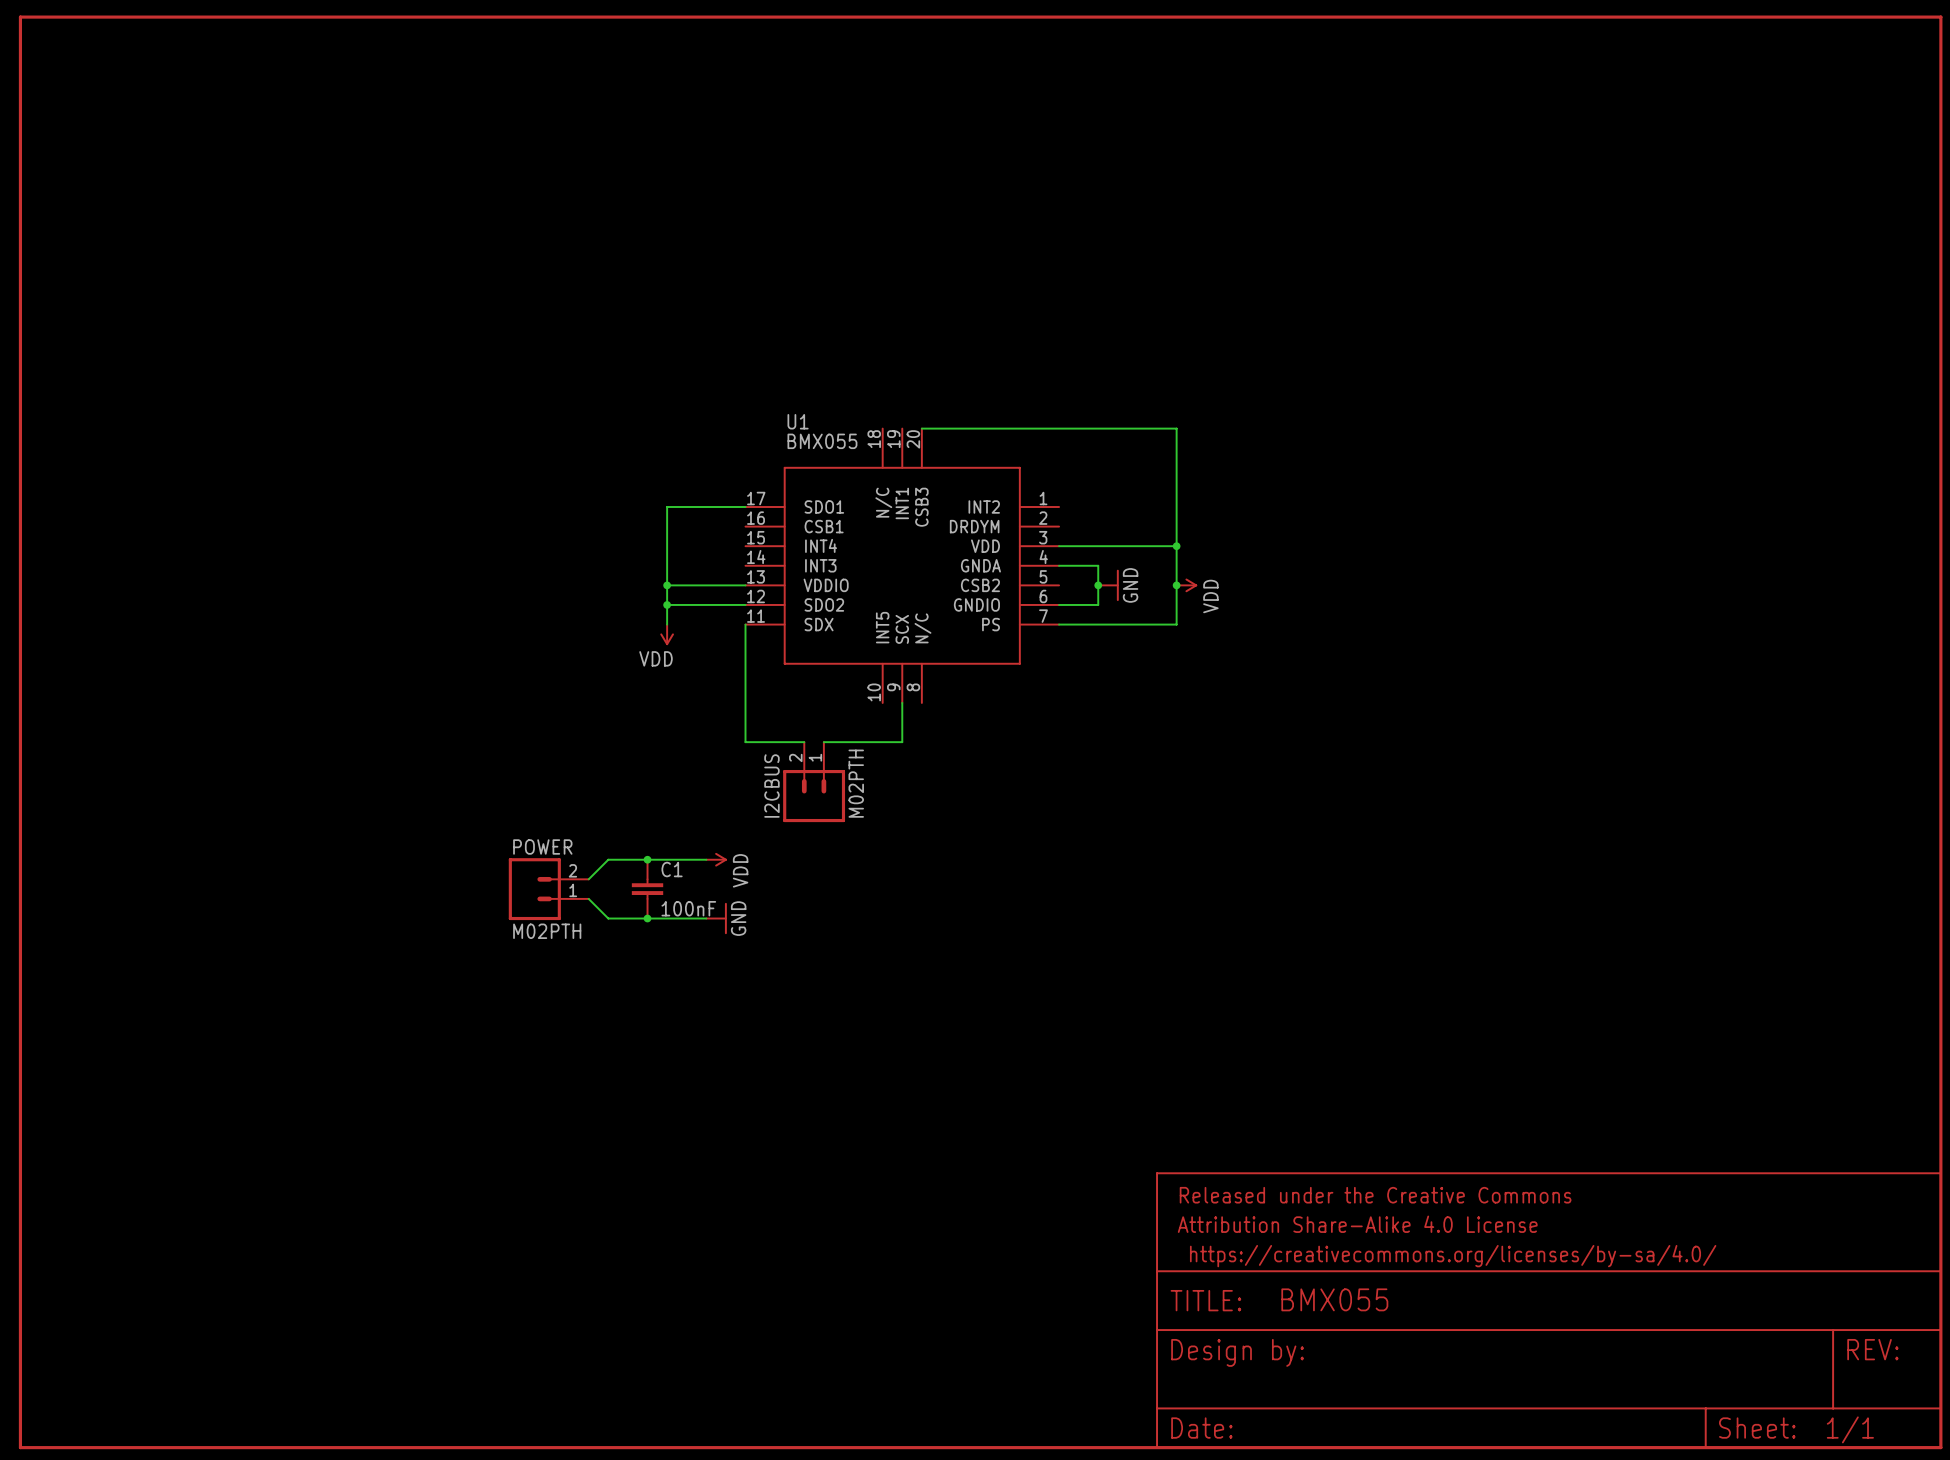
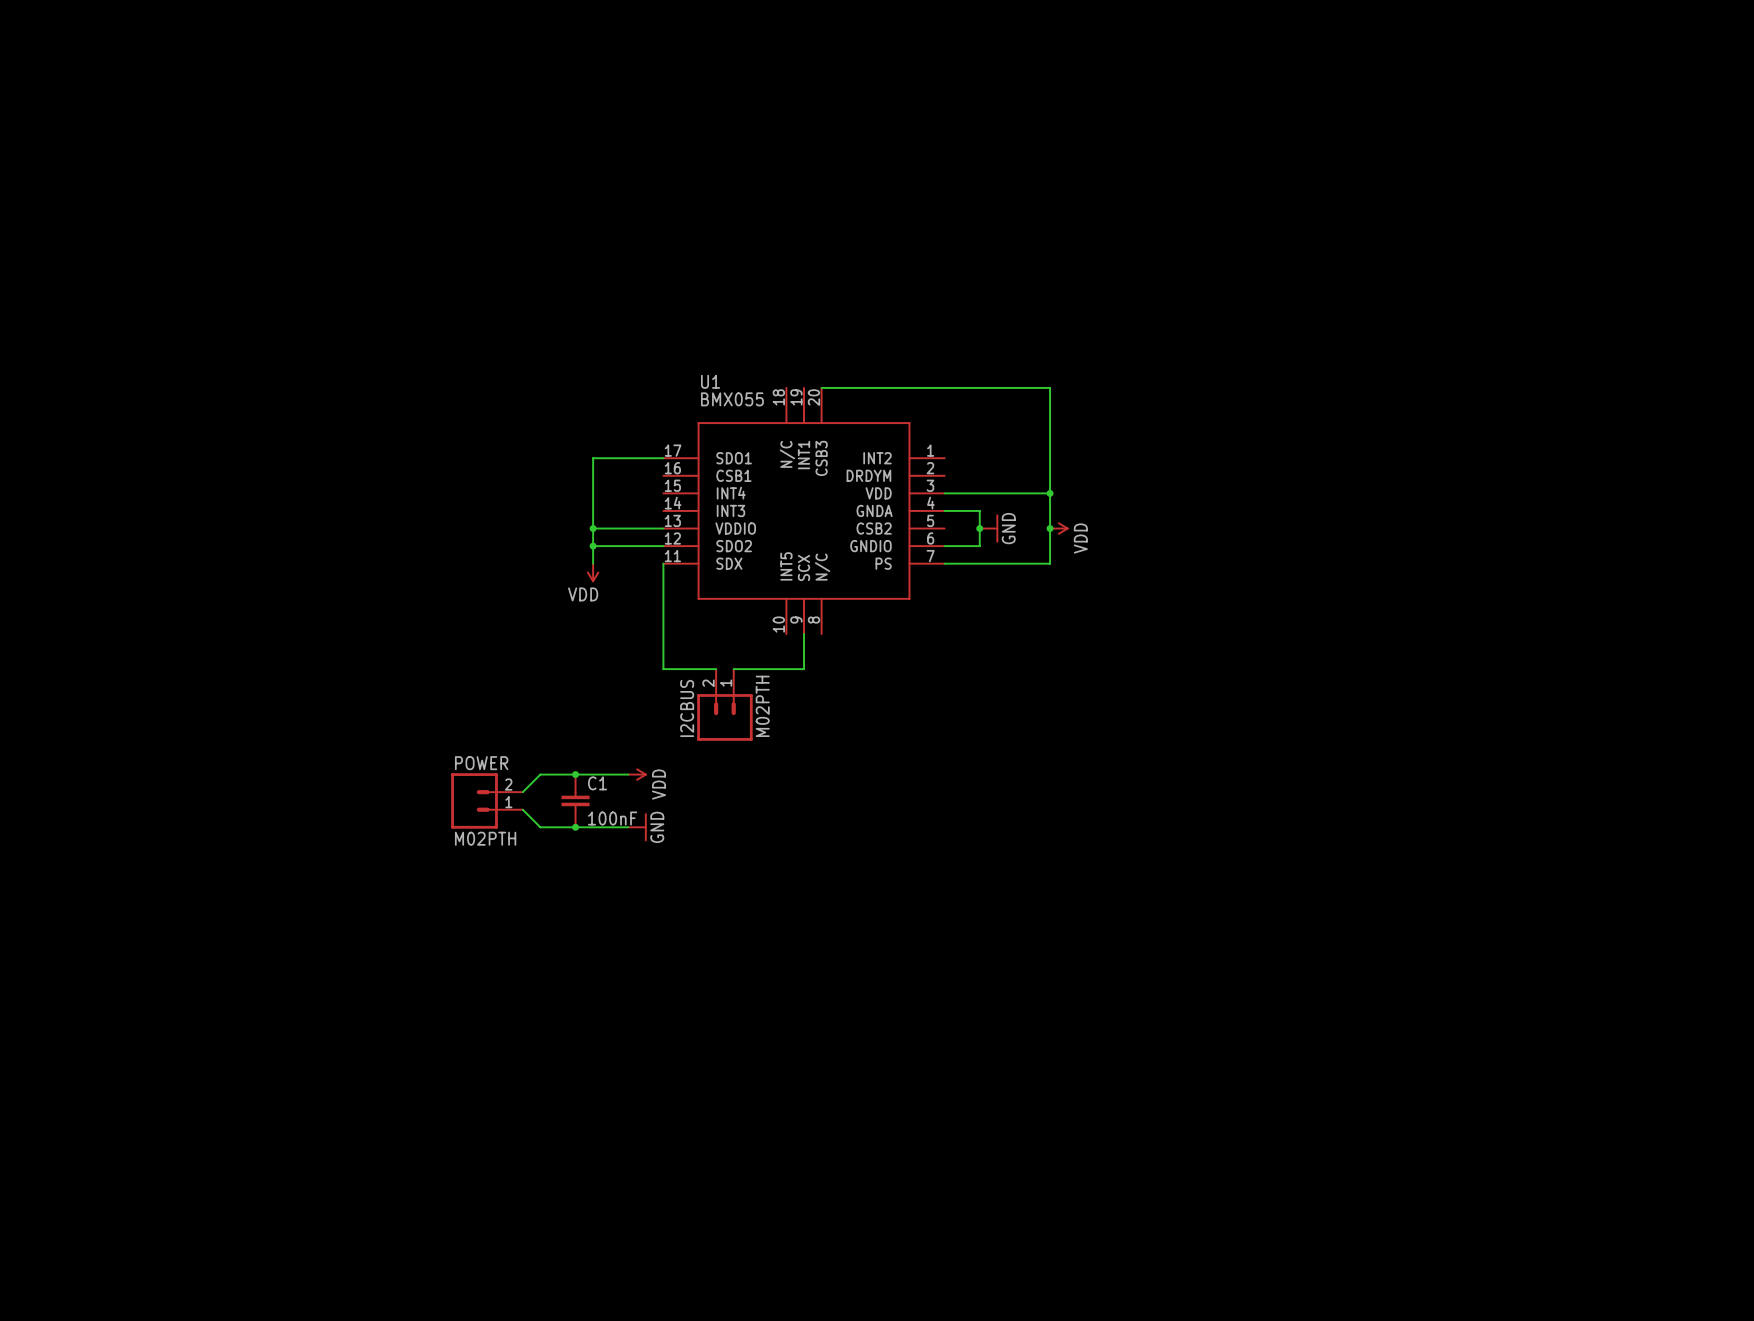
part: (980, 732) -> none
part: (1548, 1310) -> none

